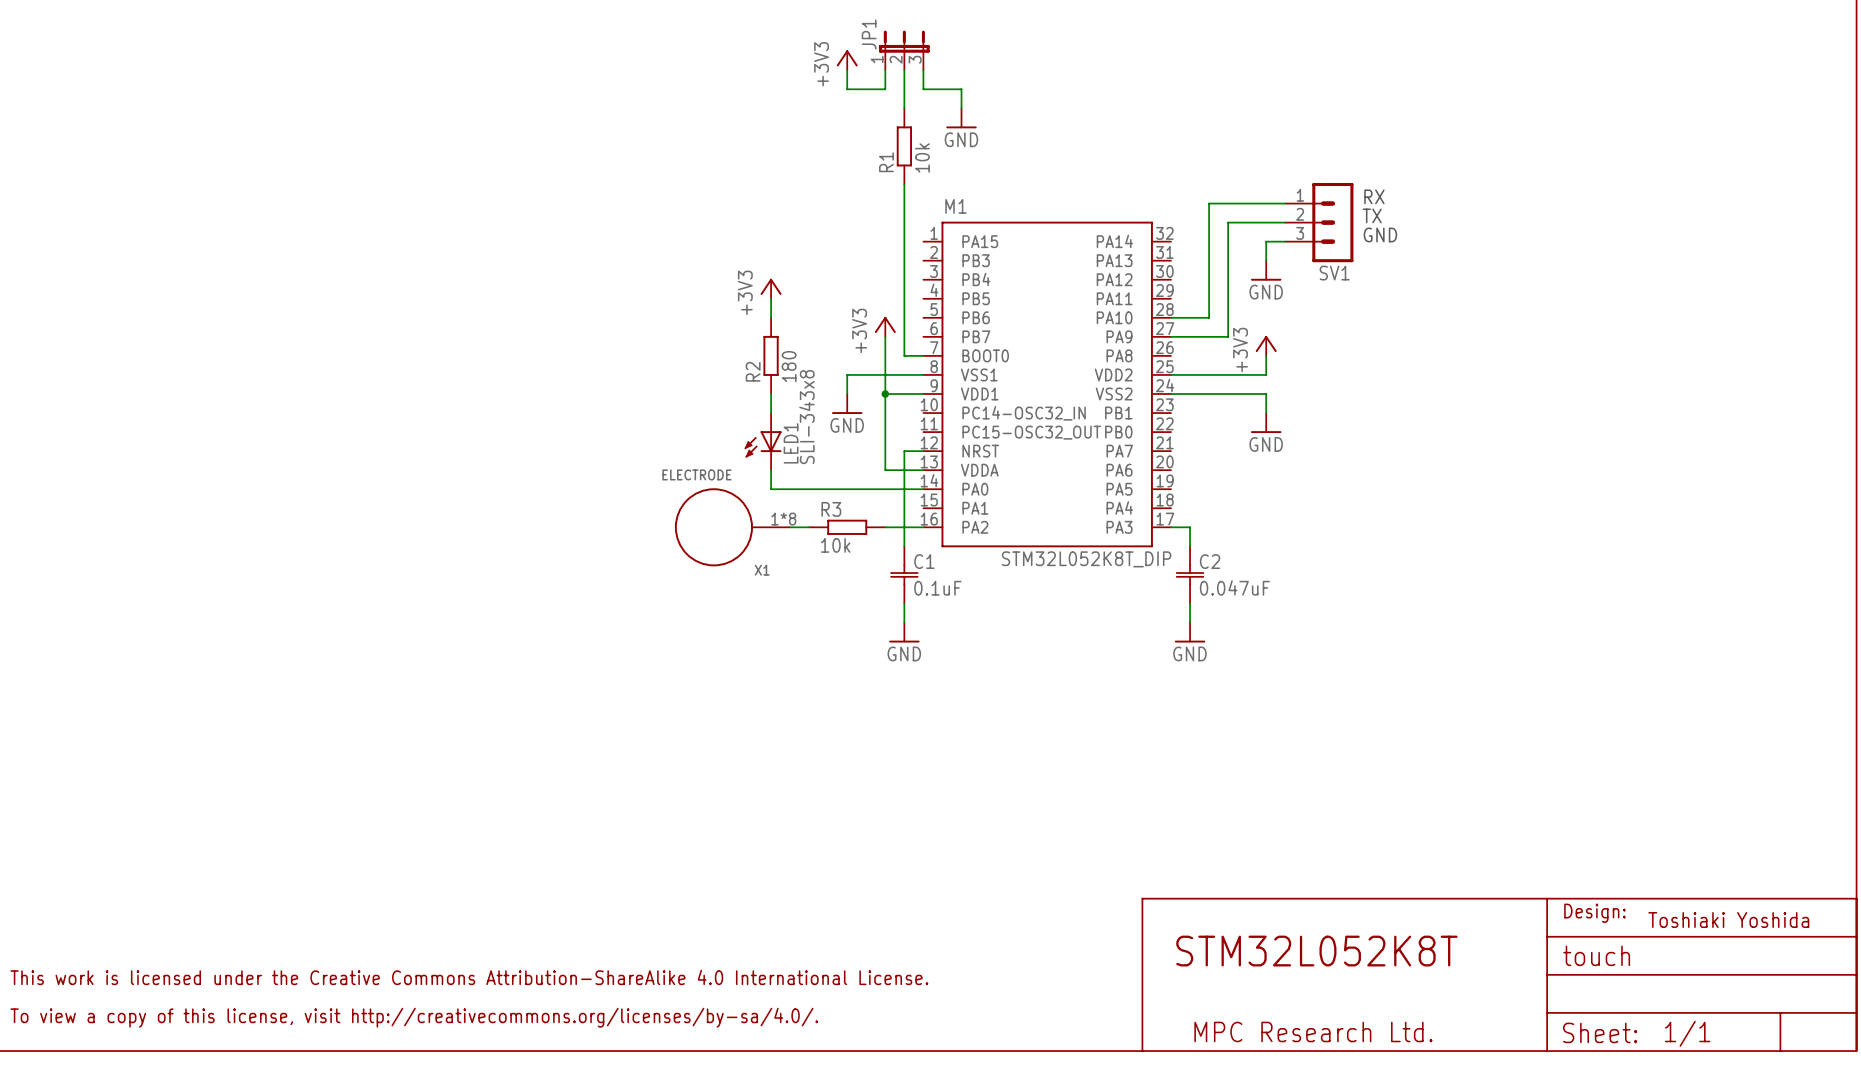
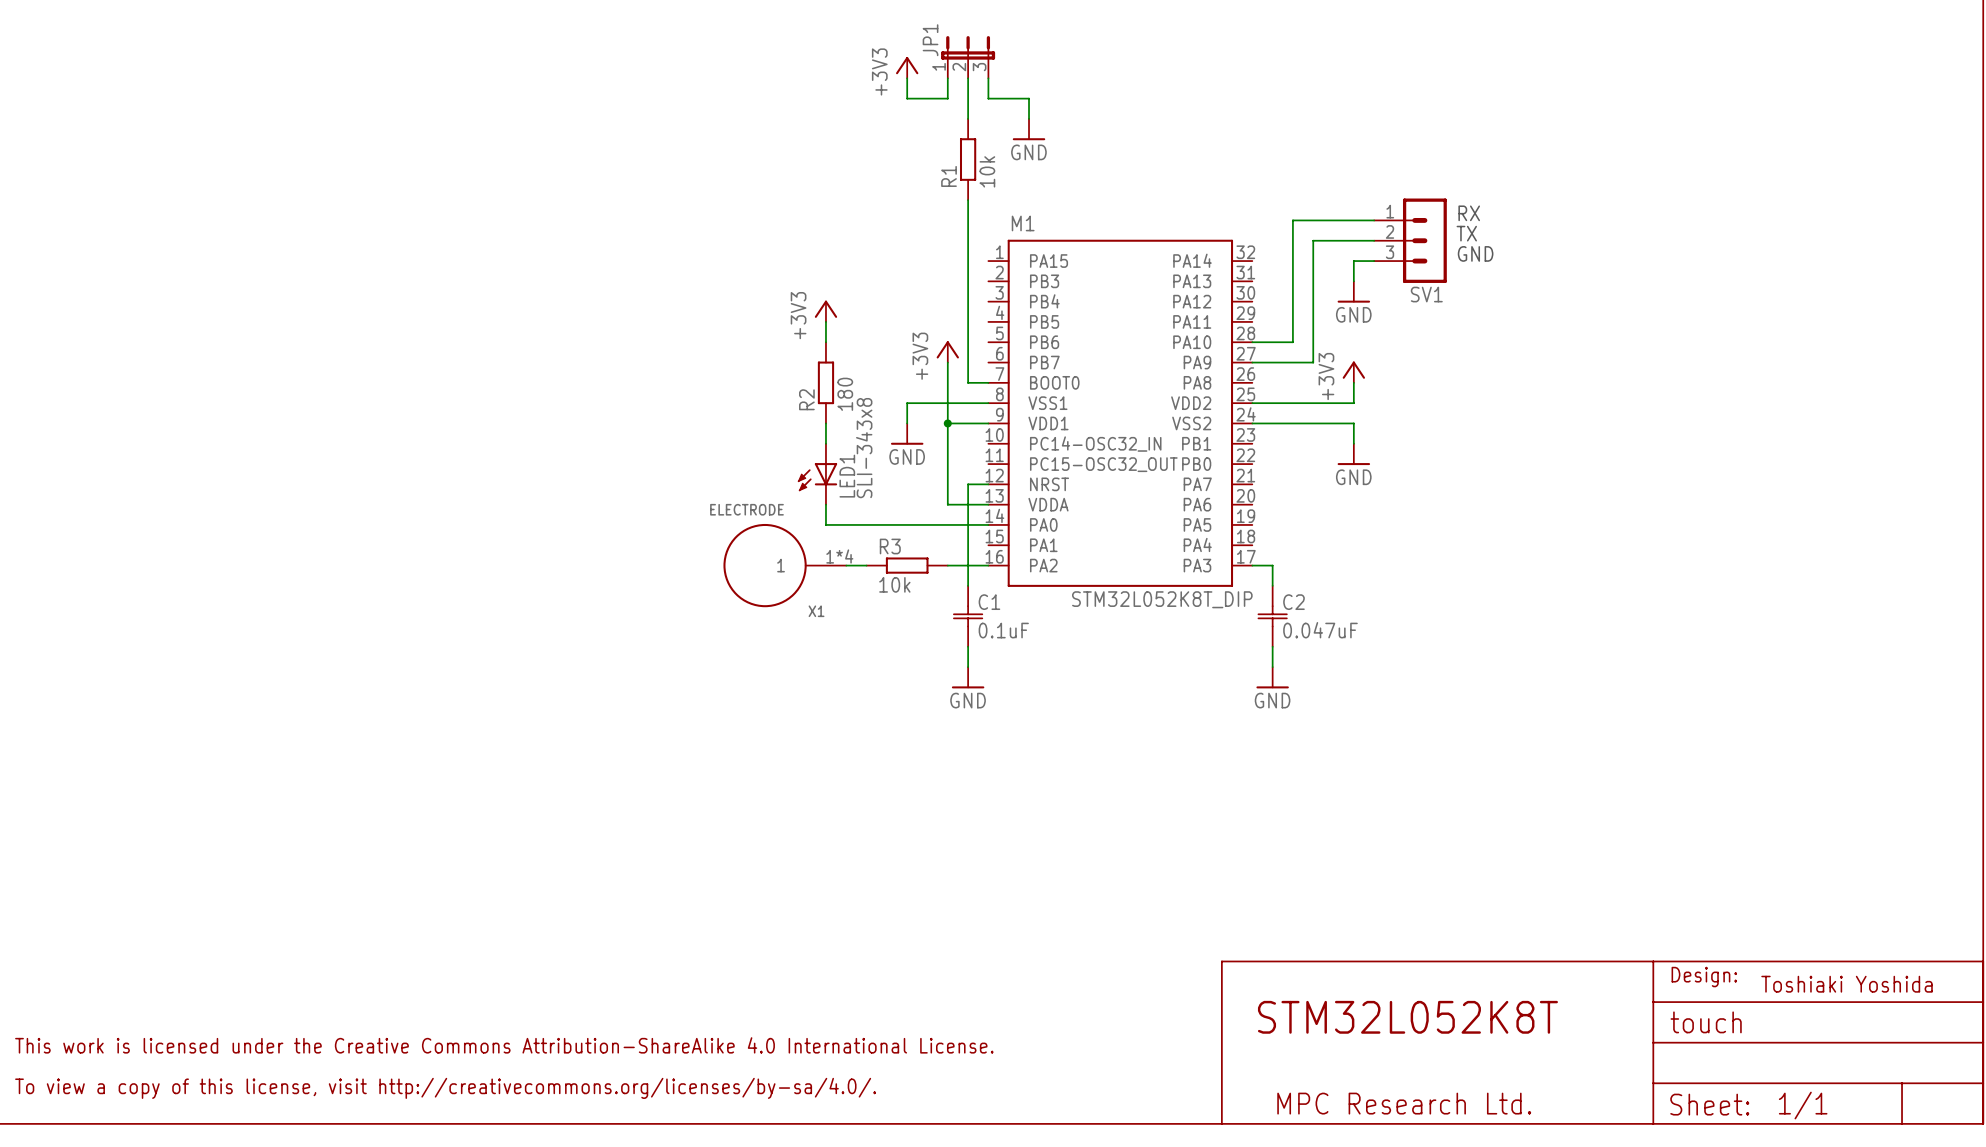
X1 pin number: 1*8 (783, 519) -> 1*4 (839, 556)
X1 pin name: none -> 1 (781, 565)

